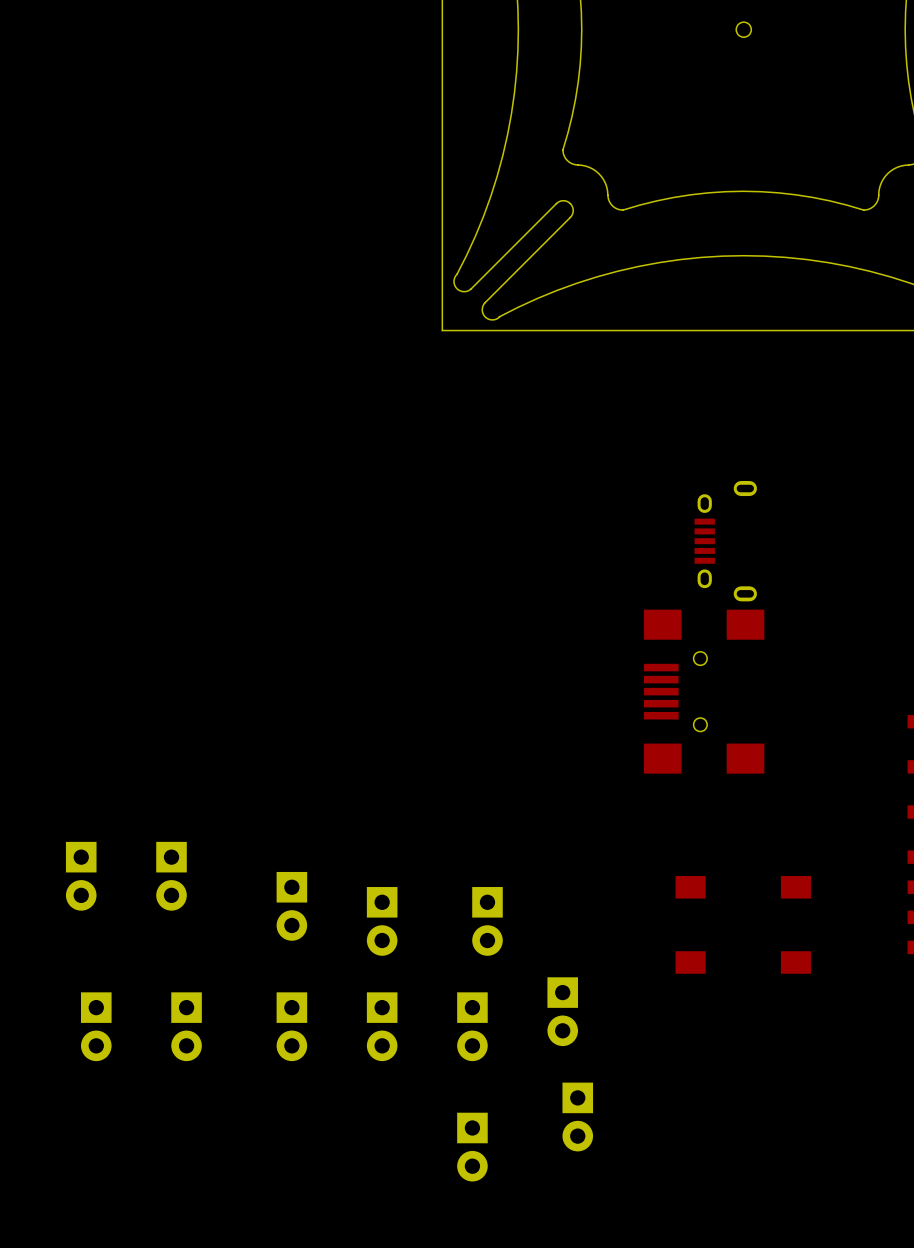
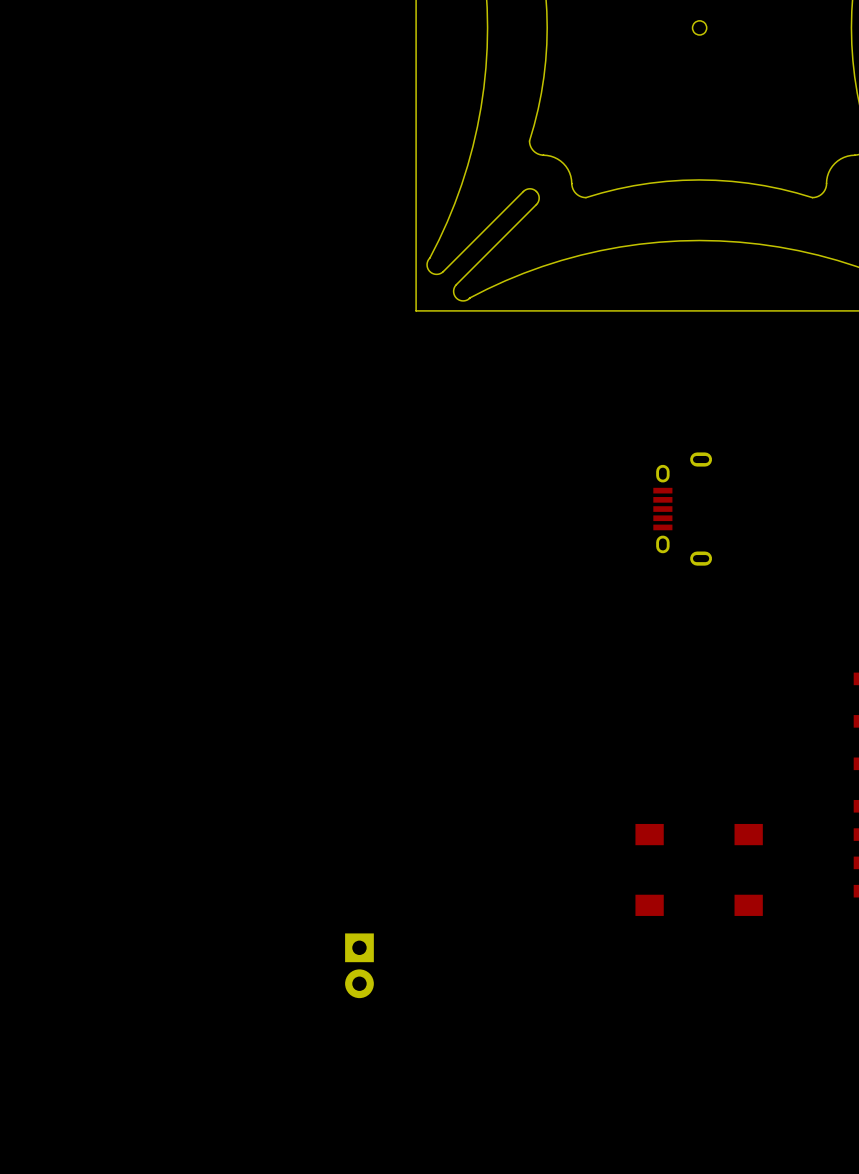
part: (704, 691) -> none
part: (81, 876) -> none
part: (171, 876) -> none
part: (291, 906) -> none
part: (382, 921) -> none
part: (487, 921) -> none
part: (562, 1011) -> none
part: (96, 1026) -> none
part: (186, 1026) -> none
part: (291, 1026) -> none
part: (472, 1026) -> none
part: (577, 1117) -> none
part: (472, 1147) -> none

